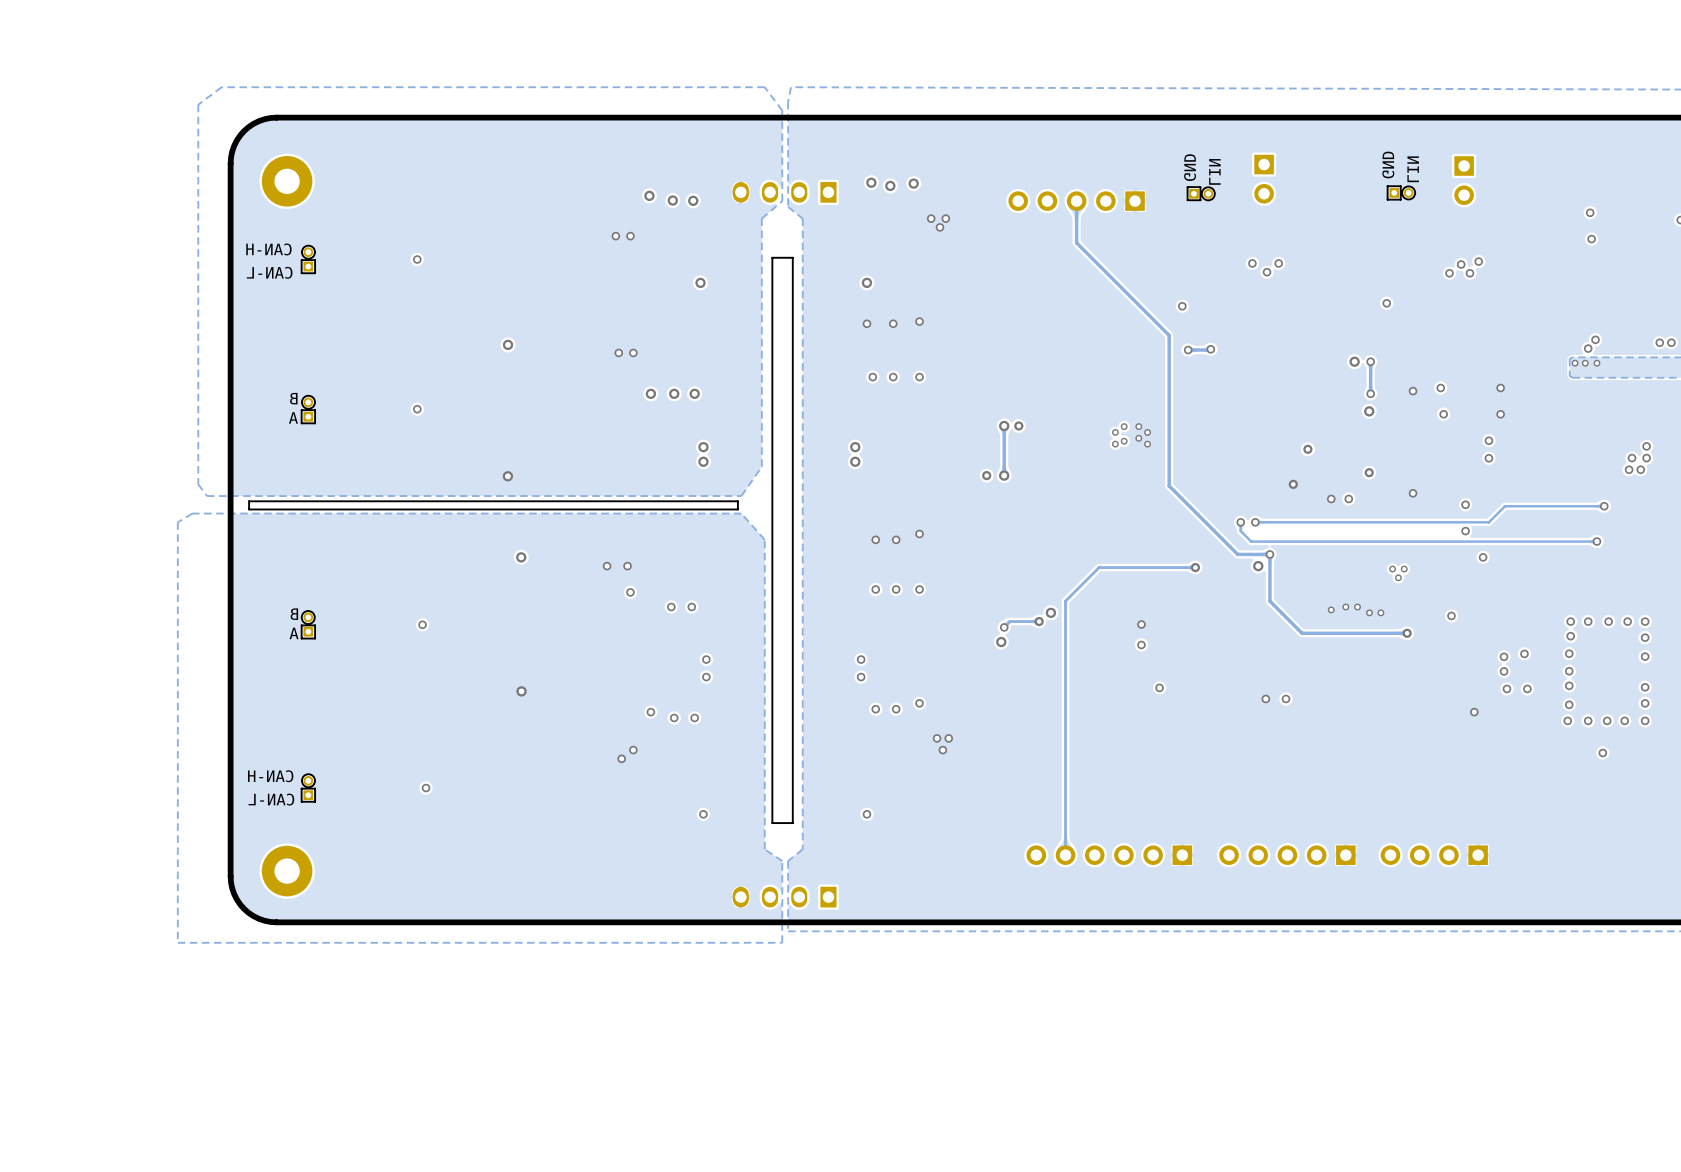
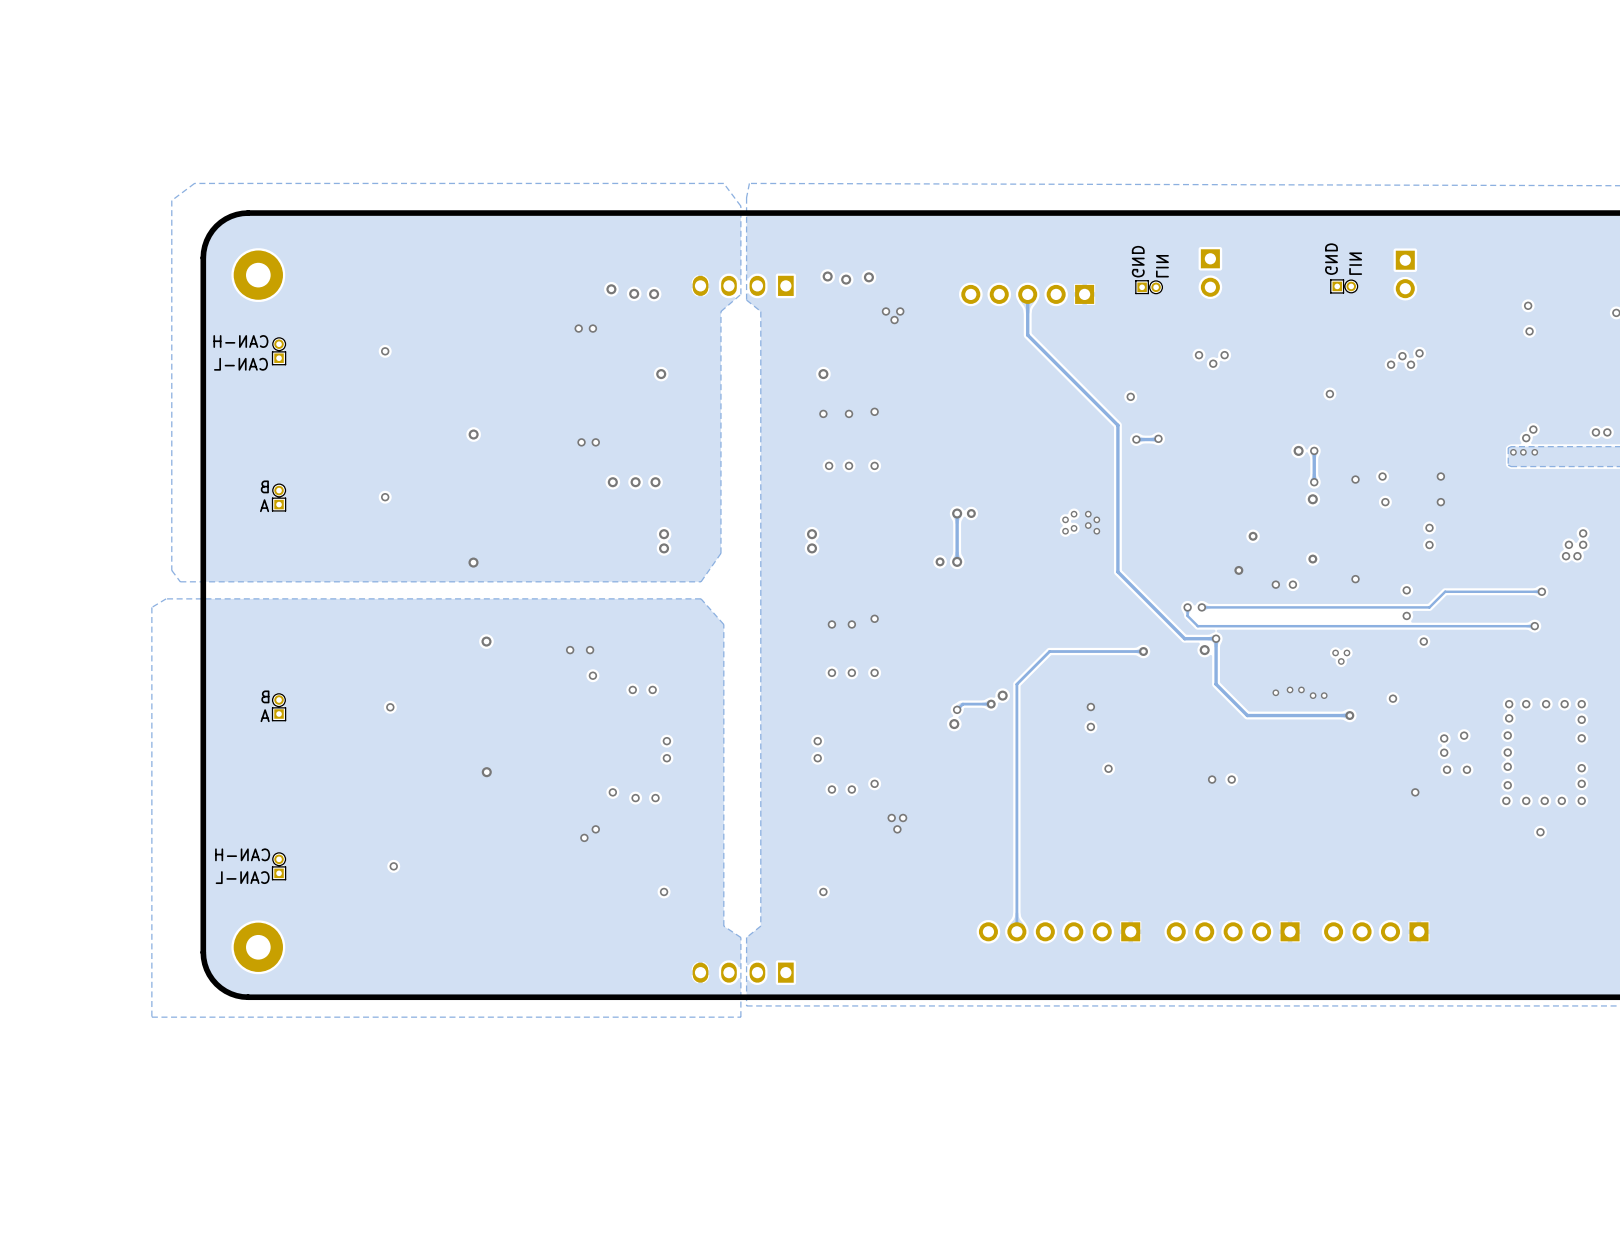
board edge: (792, 257) (772, 257) (772, 823) (792, 823) (792, 257) -> none
board edge: (737, 501) (249, 501) (249, 509) (737, 509) (737, 501) -> none

